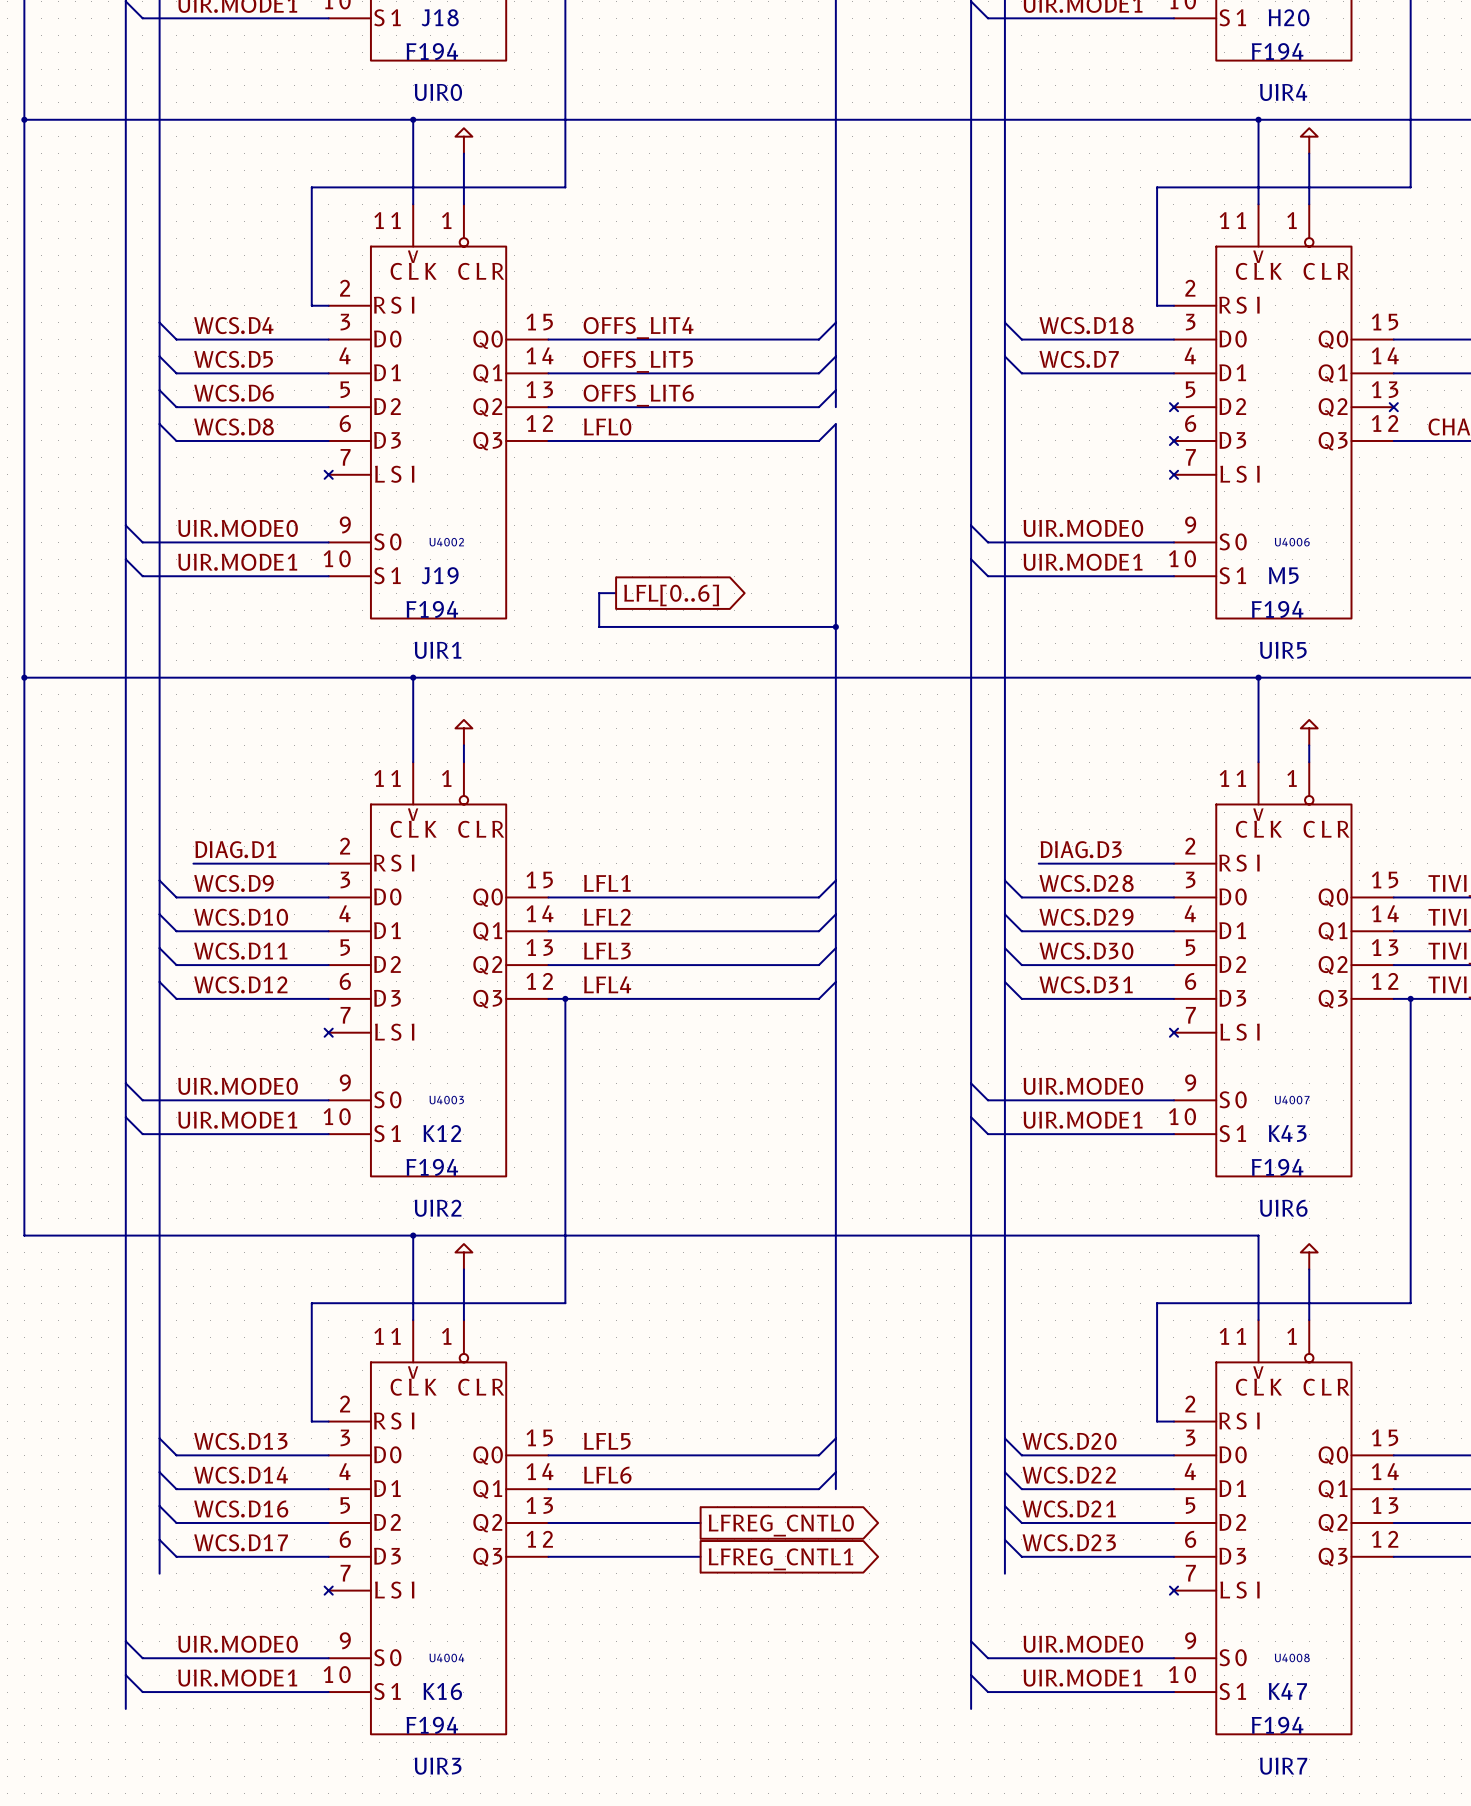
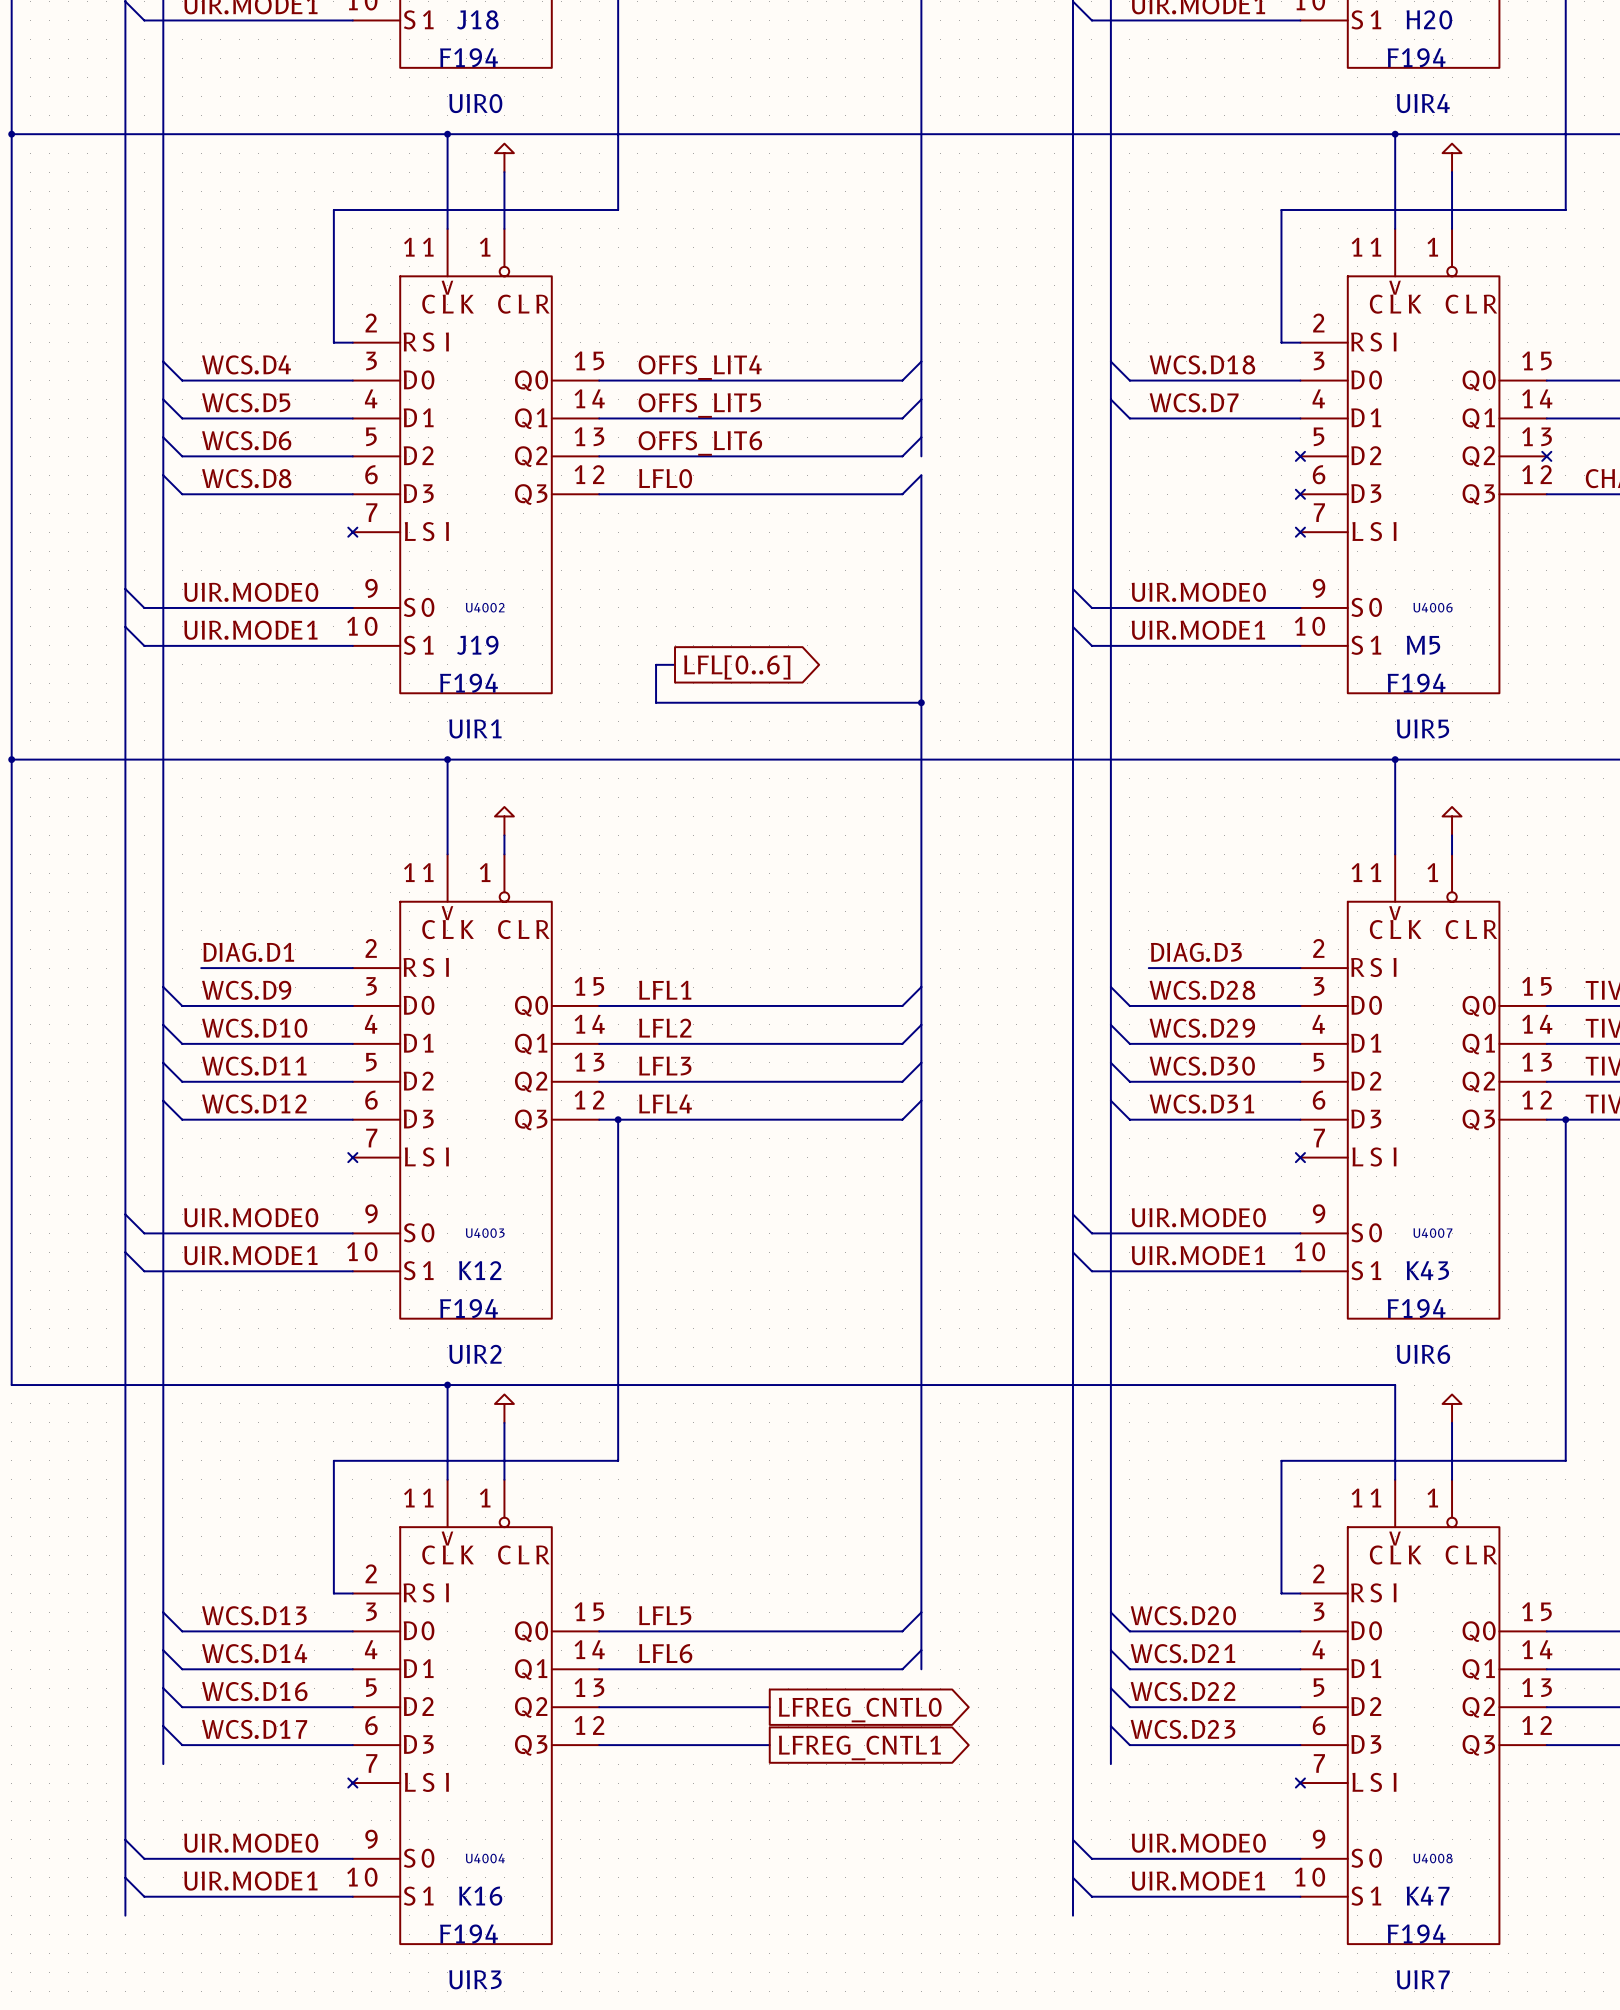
label: WCS.D22 (1069, 1475) -> WCS.D21 (1182, 1653)
label: WCS.D21 (1069, 1509) -> WCS.D22 (1182, 1691)

